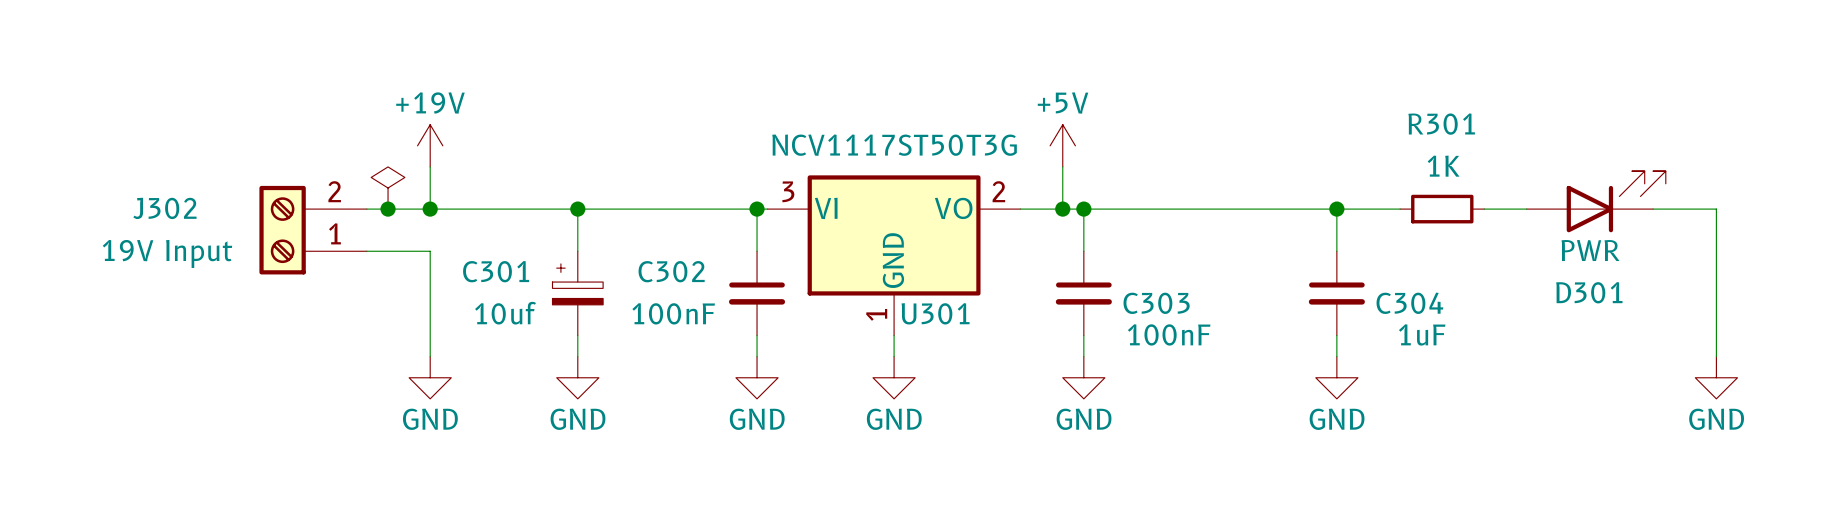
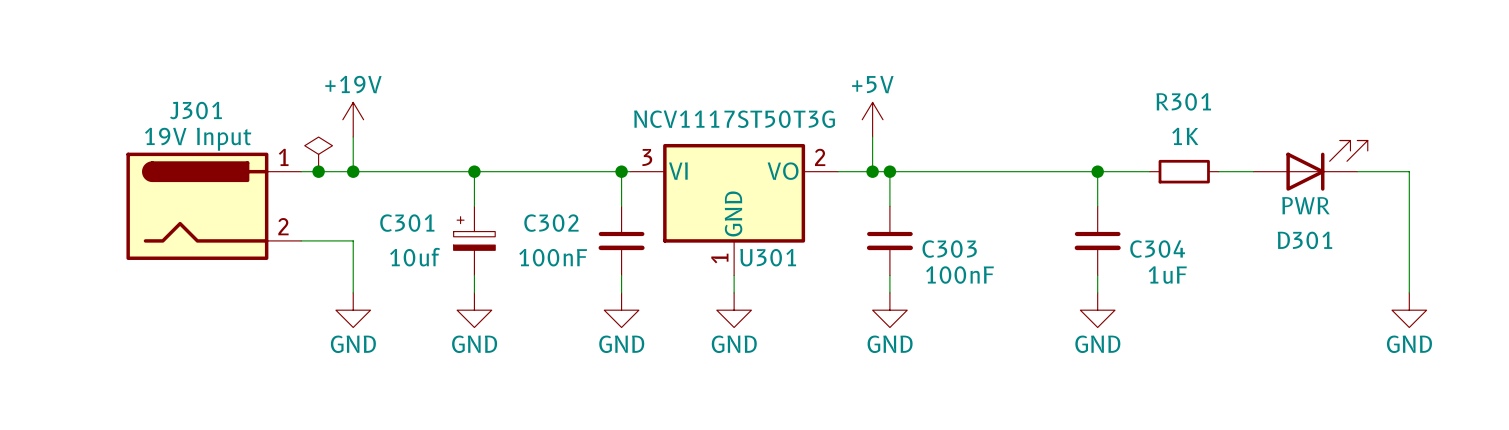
J302: 19V Input (313, 230) -> none
J301: none -> 19V Input (213, 206)
wire: (366, 251) (430, 251) (430, 293) -> (301, 240) (353, 240)

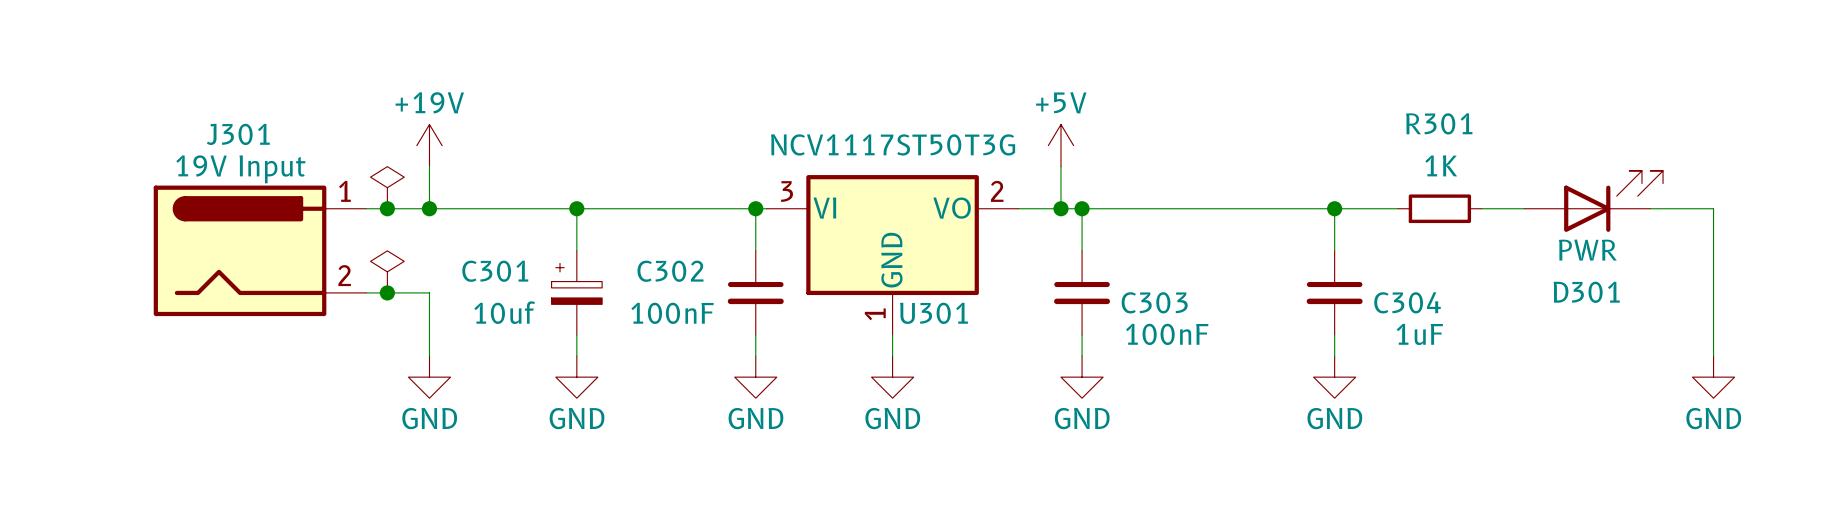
power symbol: none -> (387, 271)
junction: none -> (387, 292)

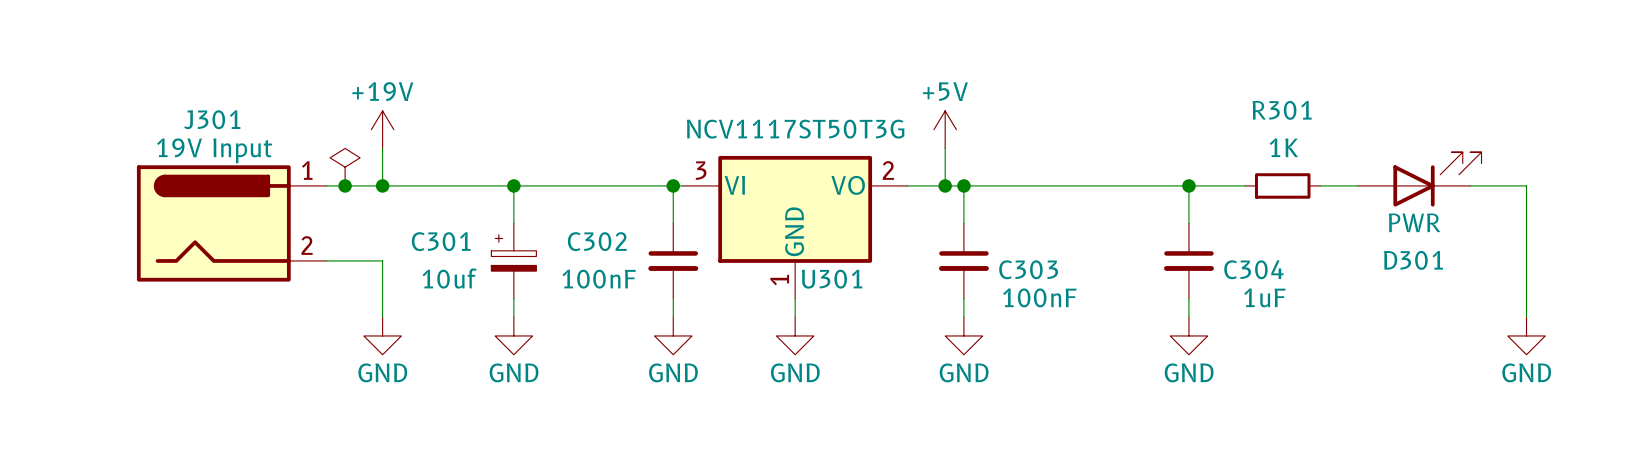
power symbol: (387, 271) -> none
junction: (387, 292) -> none

